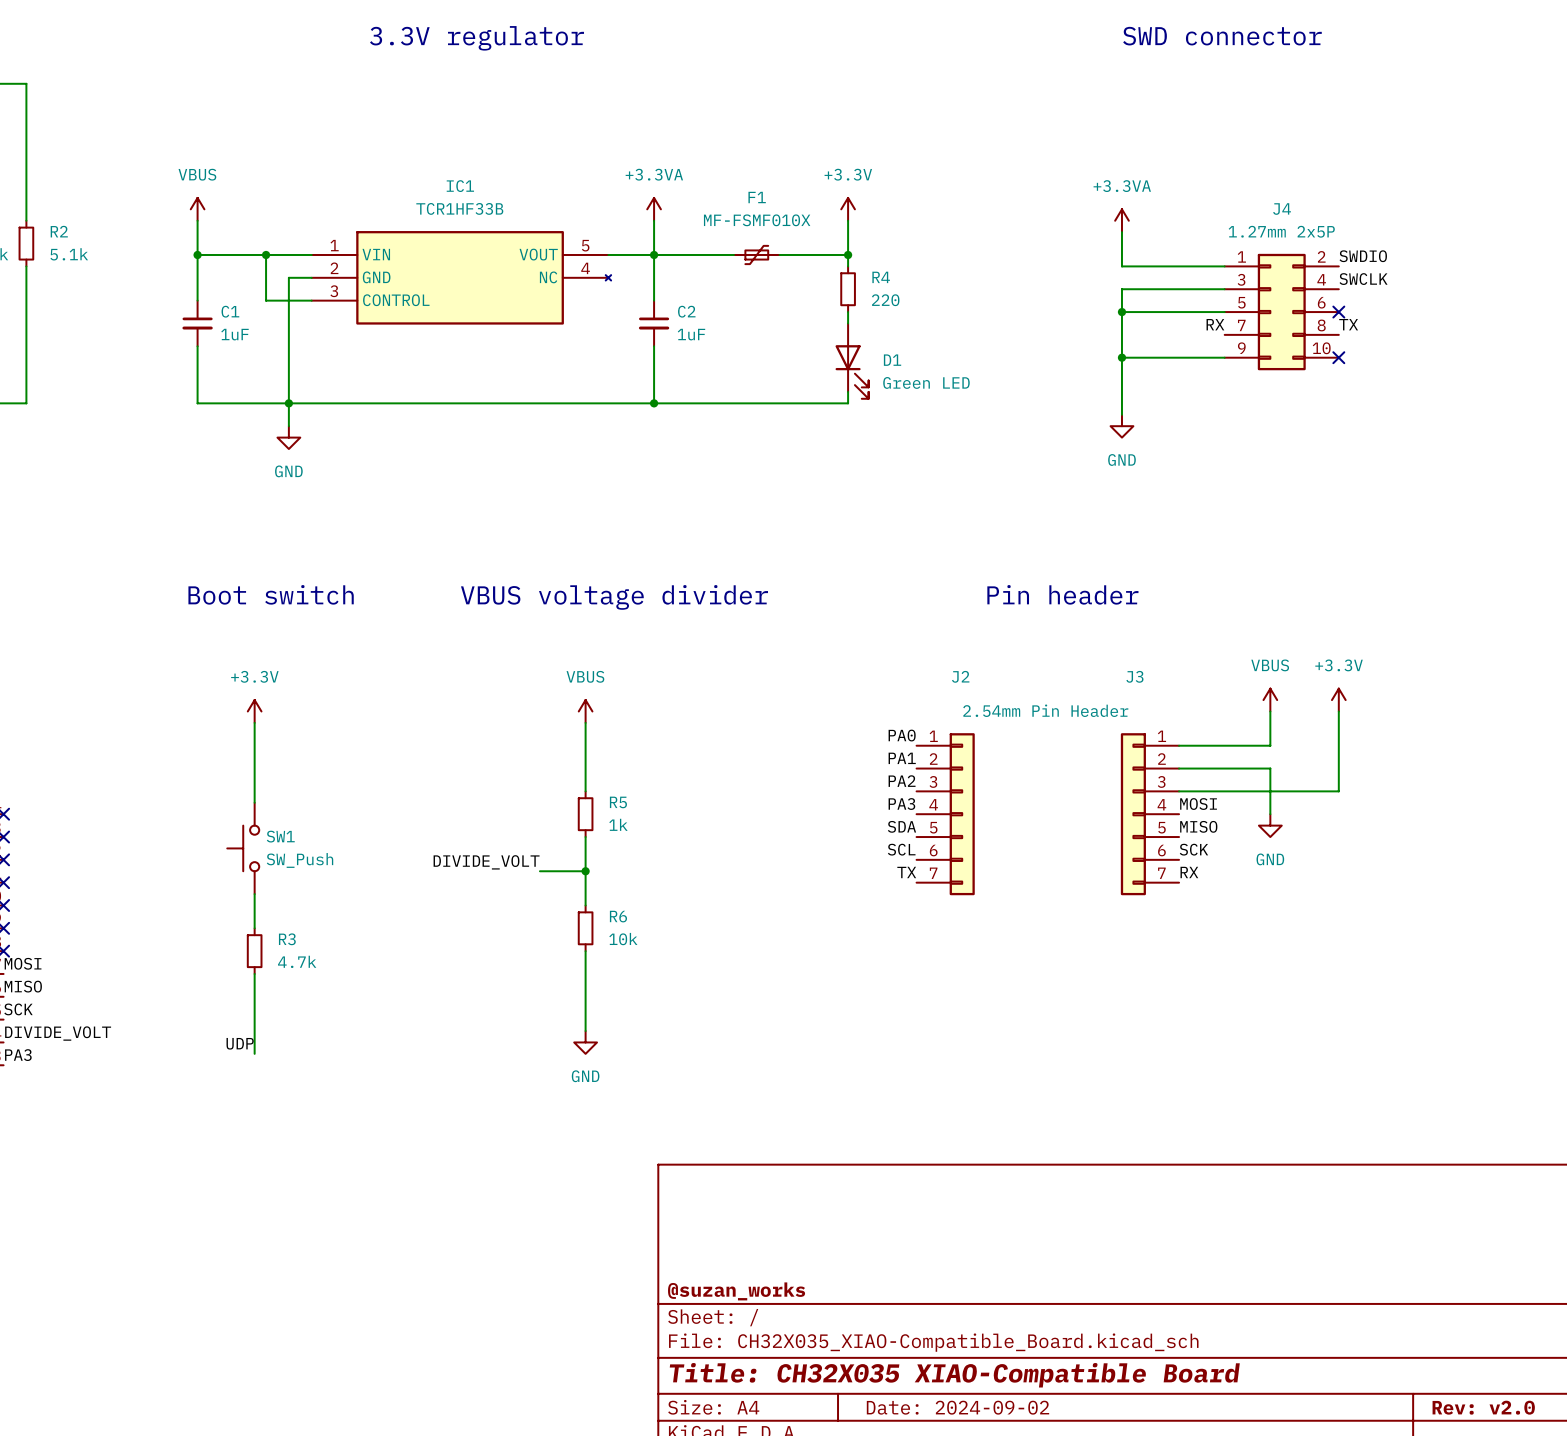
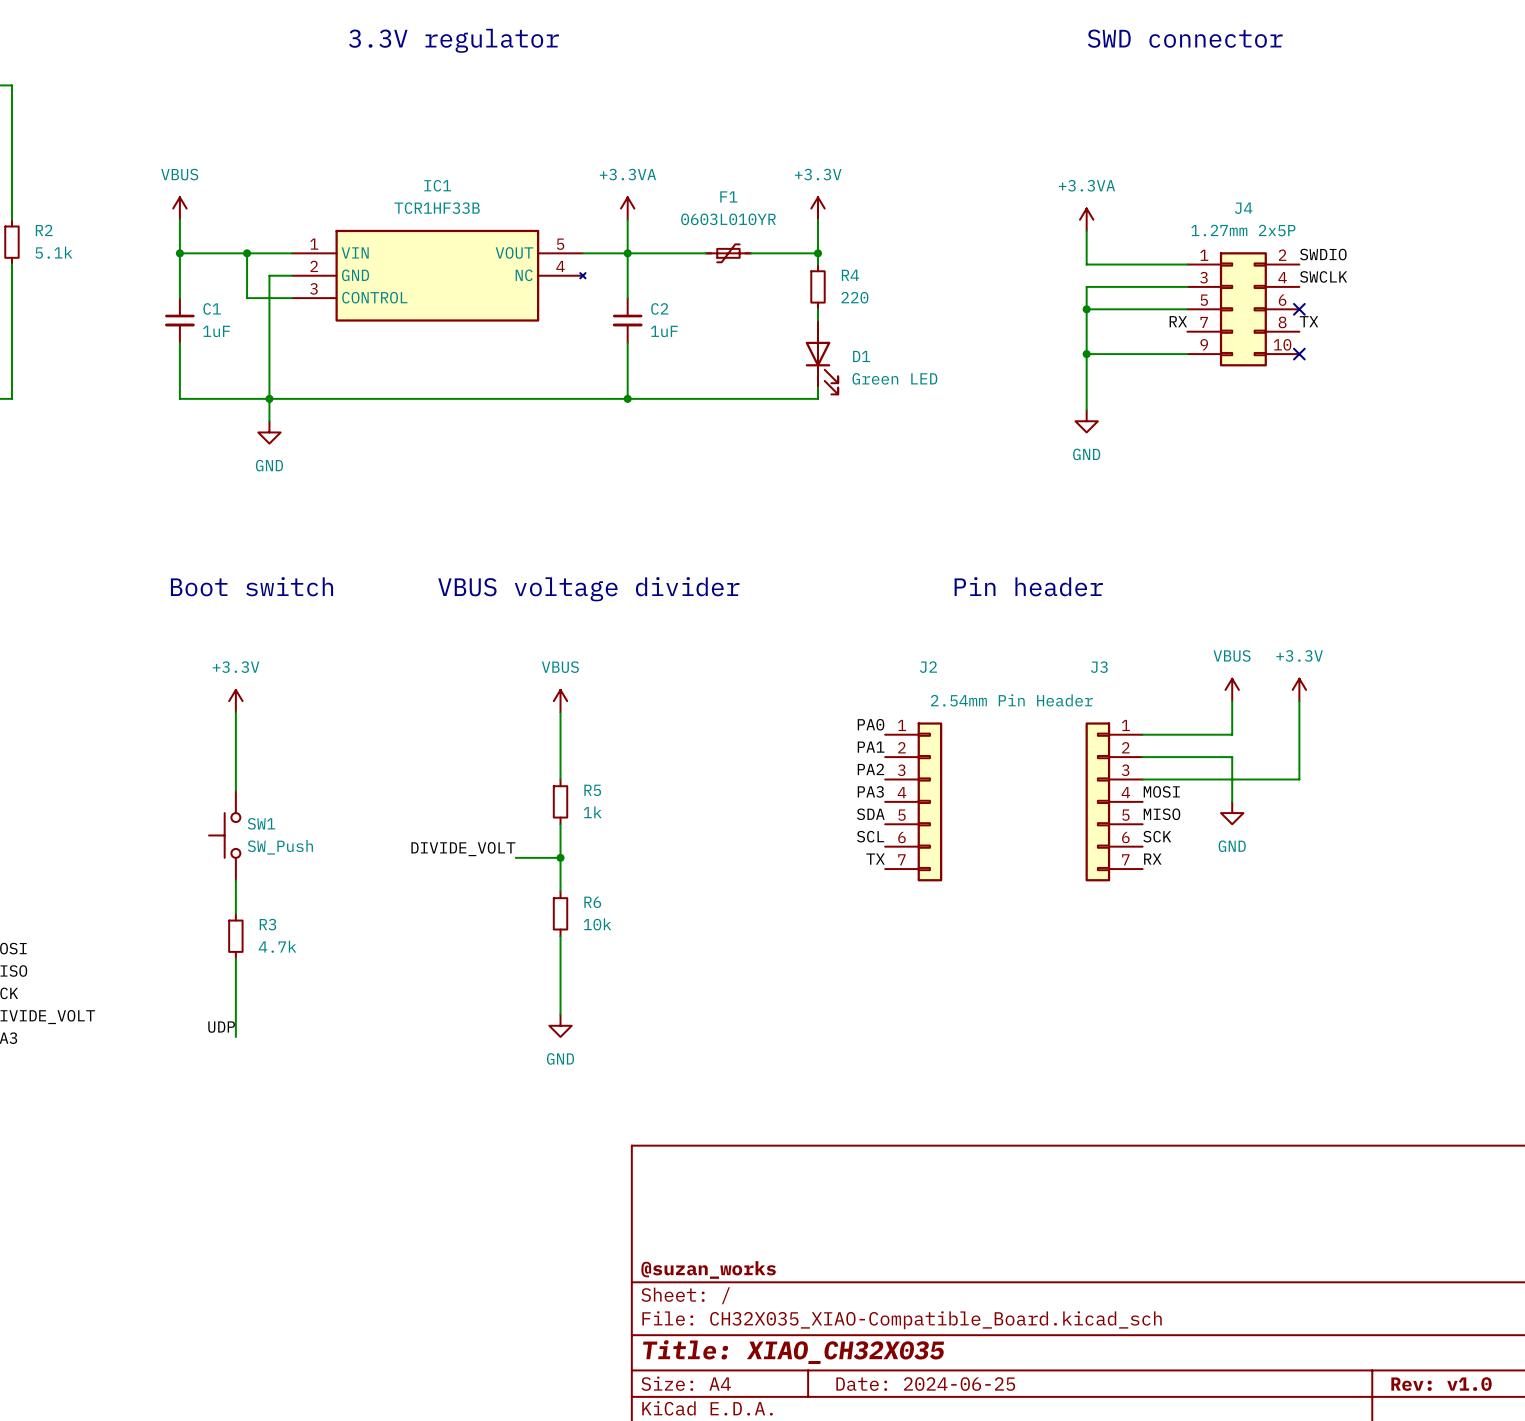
F1 value: MF-FSMF010X (757, 220) -> 0603L010YR (728, 219)
title block: Title: CH32X035 XIAO-Compatible Board (954, 1375) -> Title: XIAO_CH32X035 (793, 1352)
title block: Date: 2024-09-02 (957, 1407) -> Date: 2024-06-25 (925, 1384)
title block: Rev: v2.0 (1483, 1407) -> Rev: v1.0 (1441, 1384)

